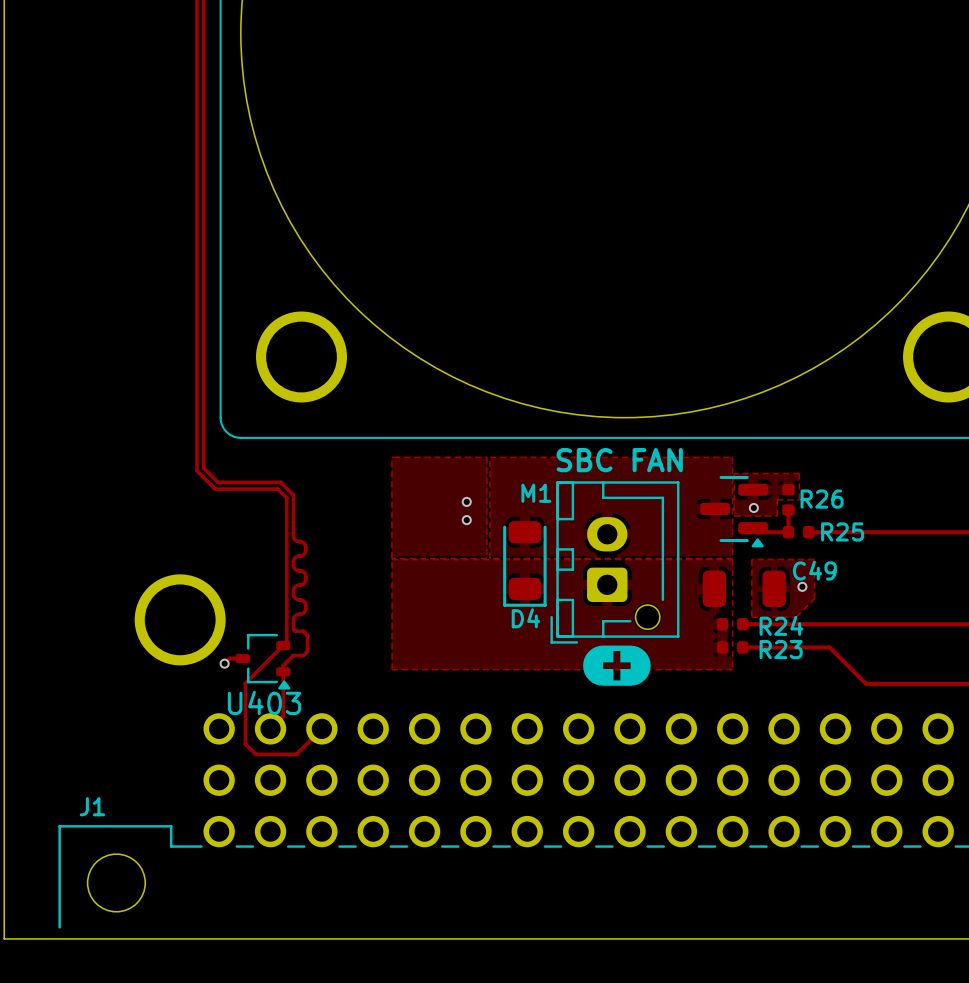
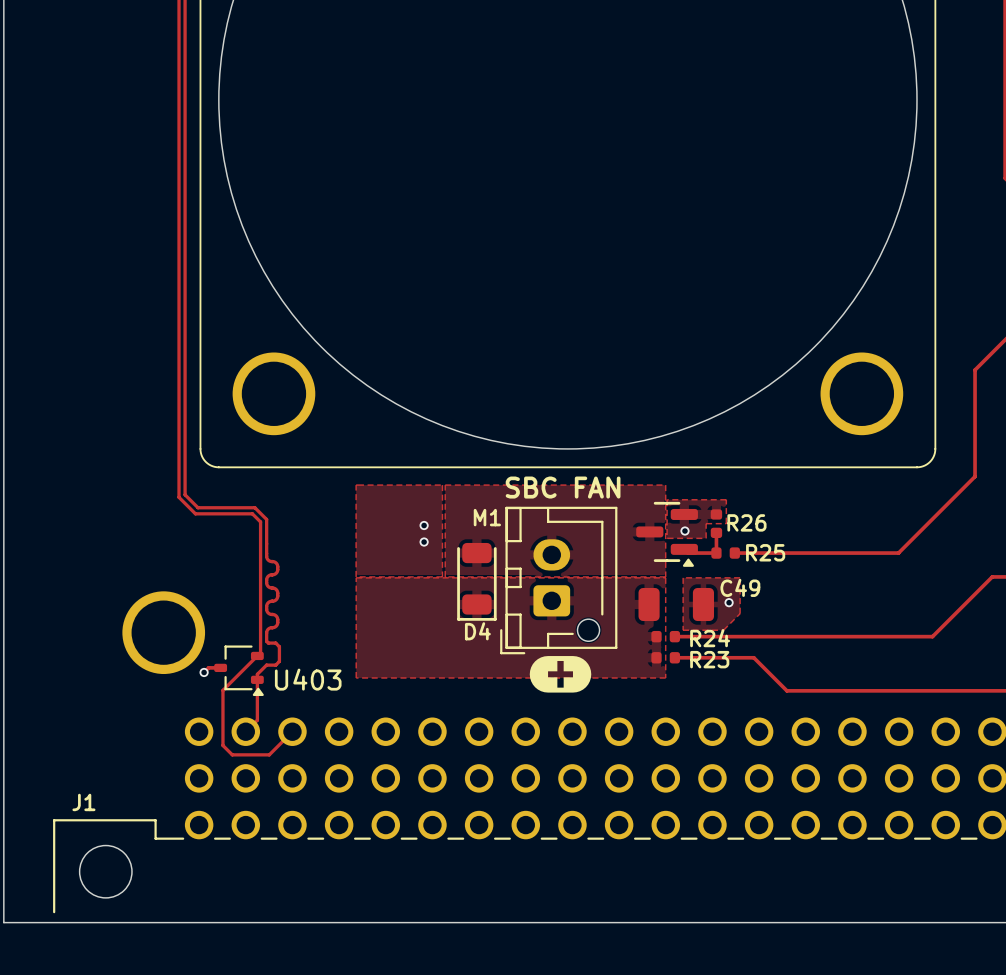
U403 name position: U403 (264, 702) -> U403 (308, 679)

